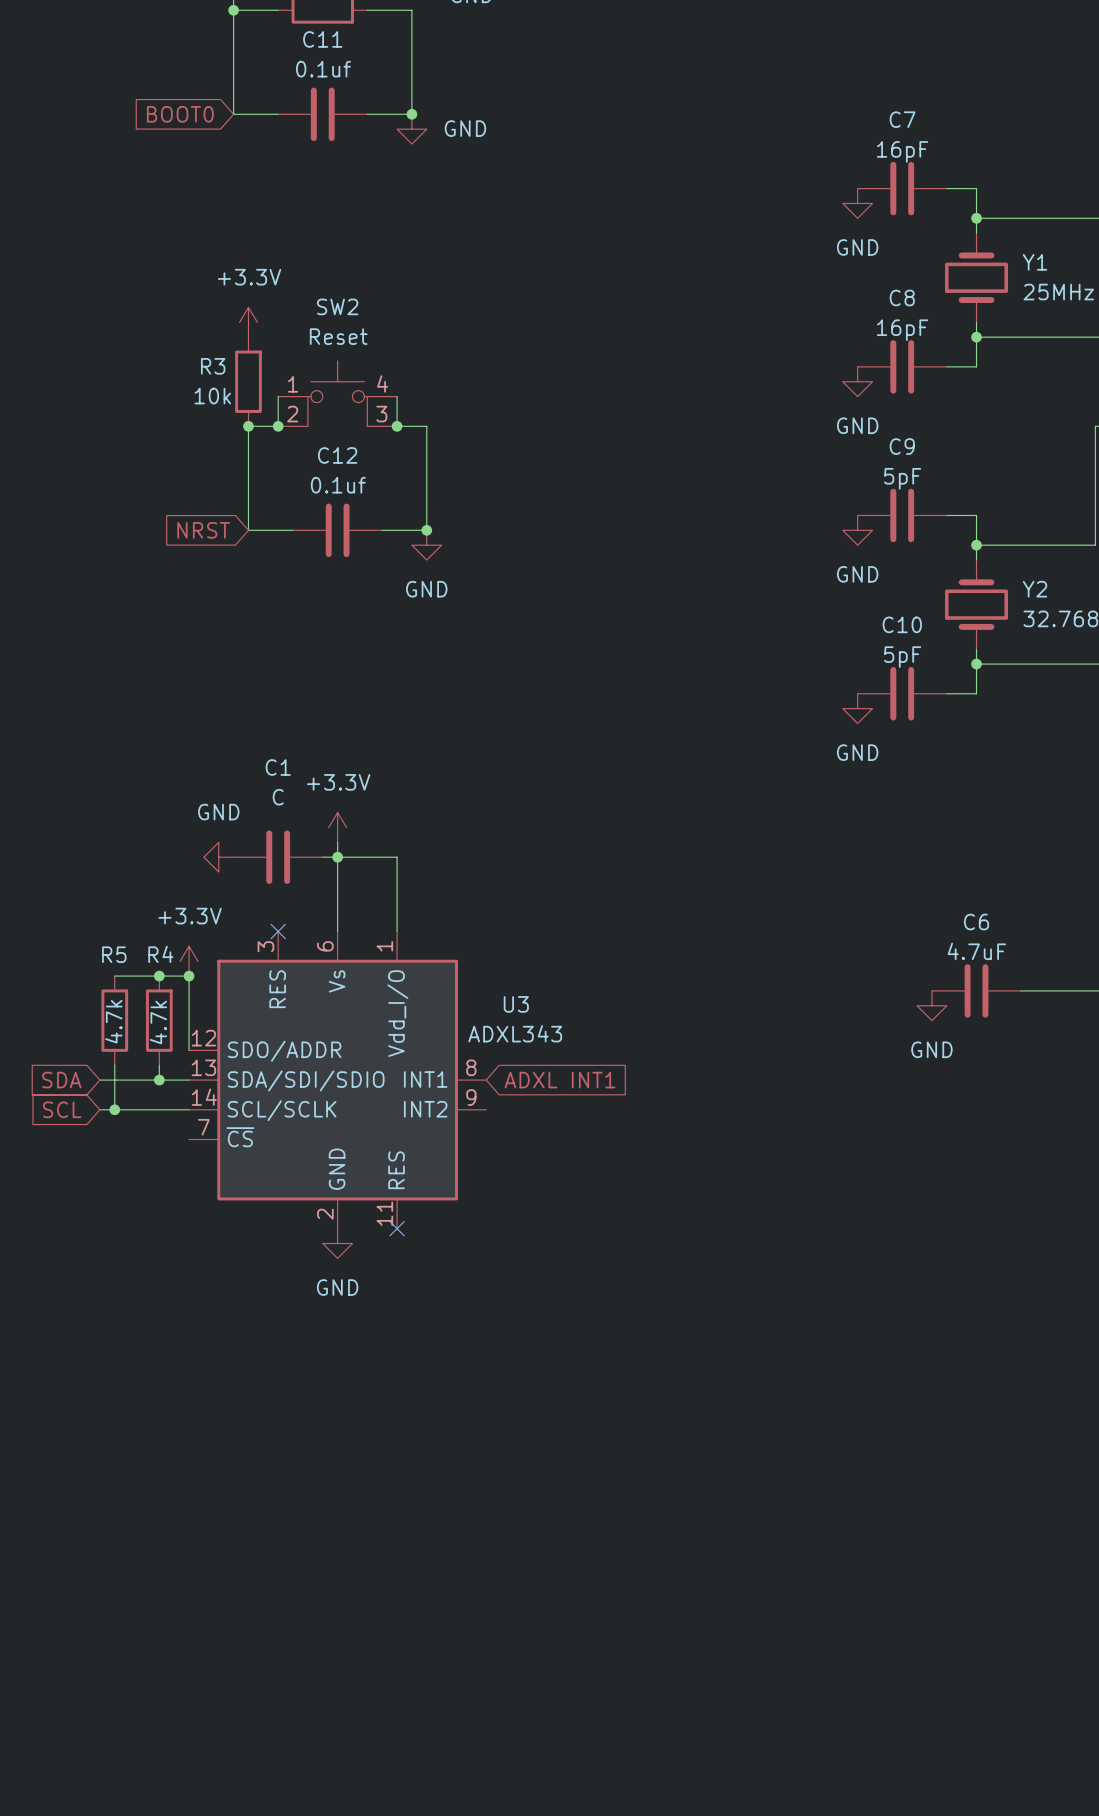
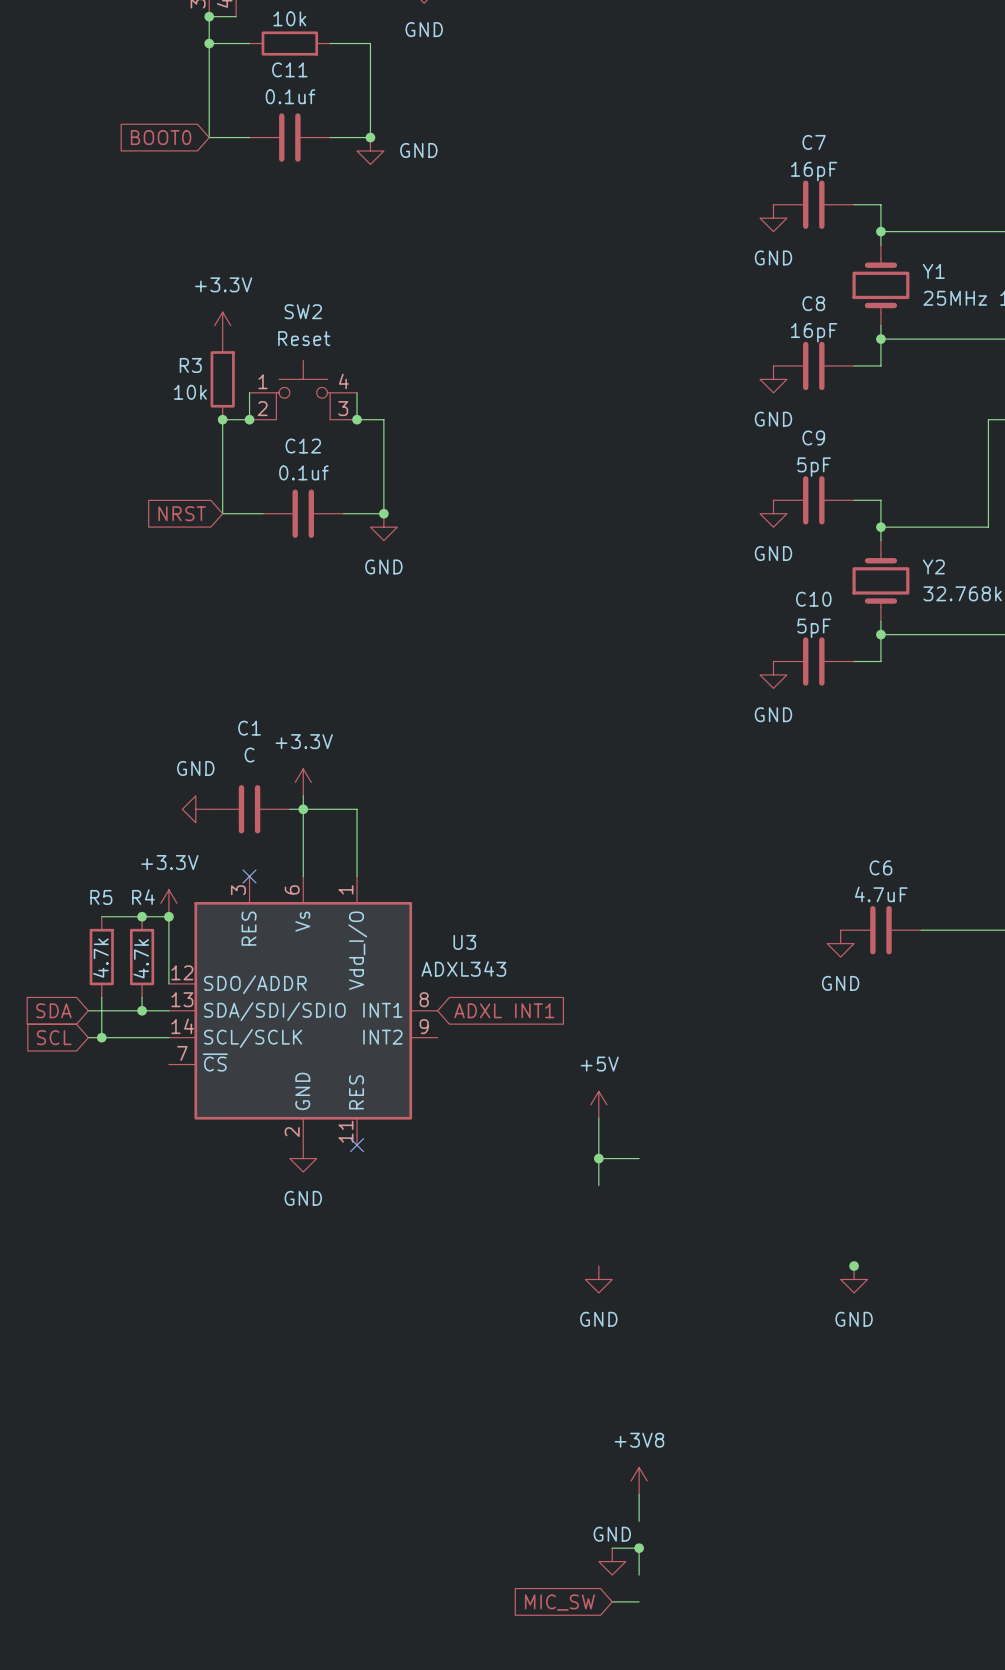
power symbol: none -> +5V (598, 1104)
wire: none -> (598, 1118) (598, 1185)
wire: none -> (598, 1158) (639, 1158)
junction: none -> (598, 1158)
junction: none -> (854, 1266)
power symbol: none -> GND (598, 1279)
power symbol: none -> GND (854, 1279)
power symbol: none -> +3V8 (639, 1481)
wire: none -> (639, 1494) (639, 1521)
wire: none -> (612, 1548) (639, 1548) (639, 1575)
junction: none -> (639, 1548)
power symbol: none -> GND (612, 1561)
wire: none -> (612, 1601) (639, 1601)
global label: none -> MIC_SW (559, 1602)

